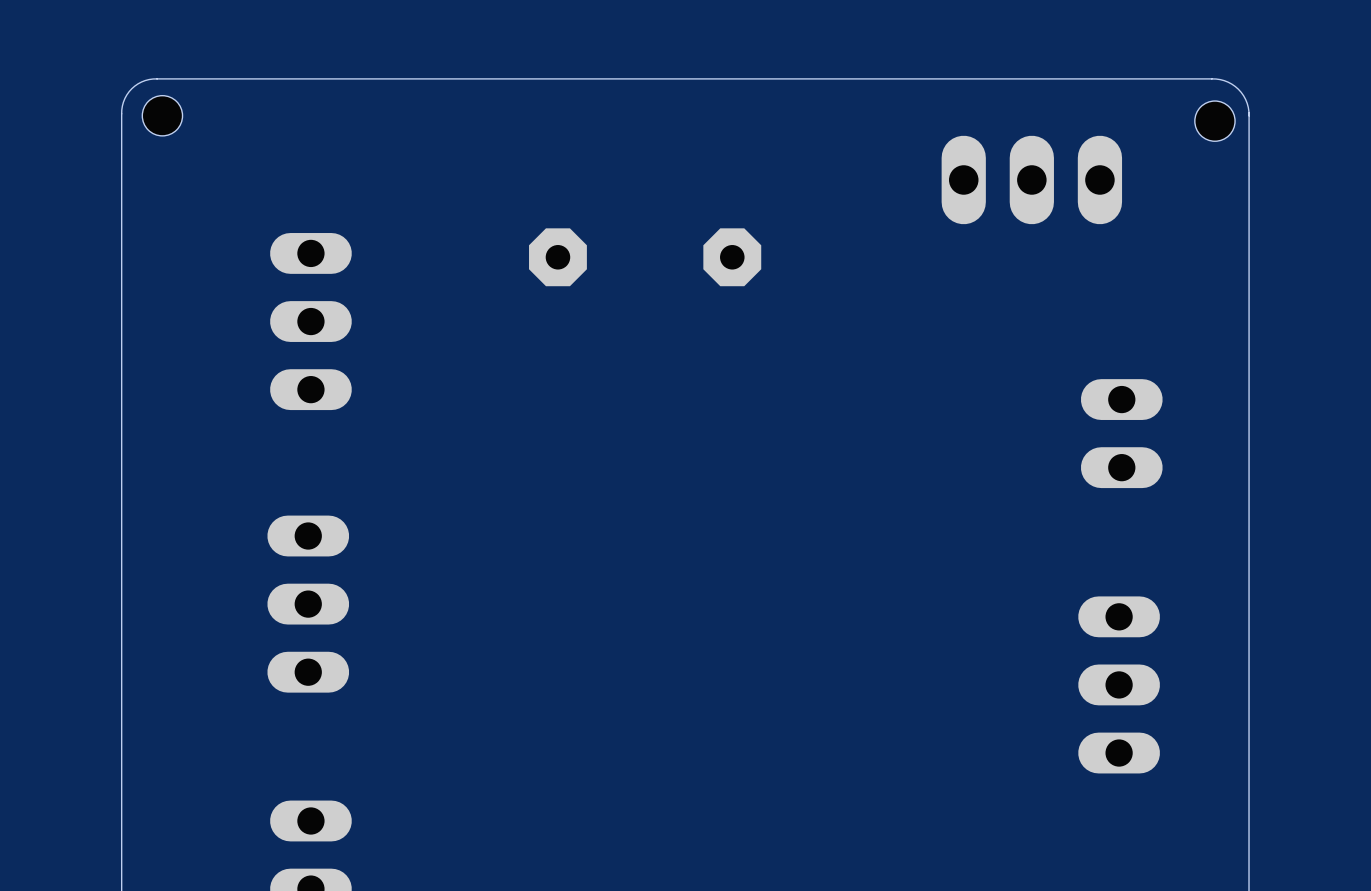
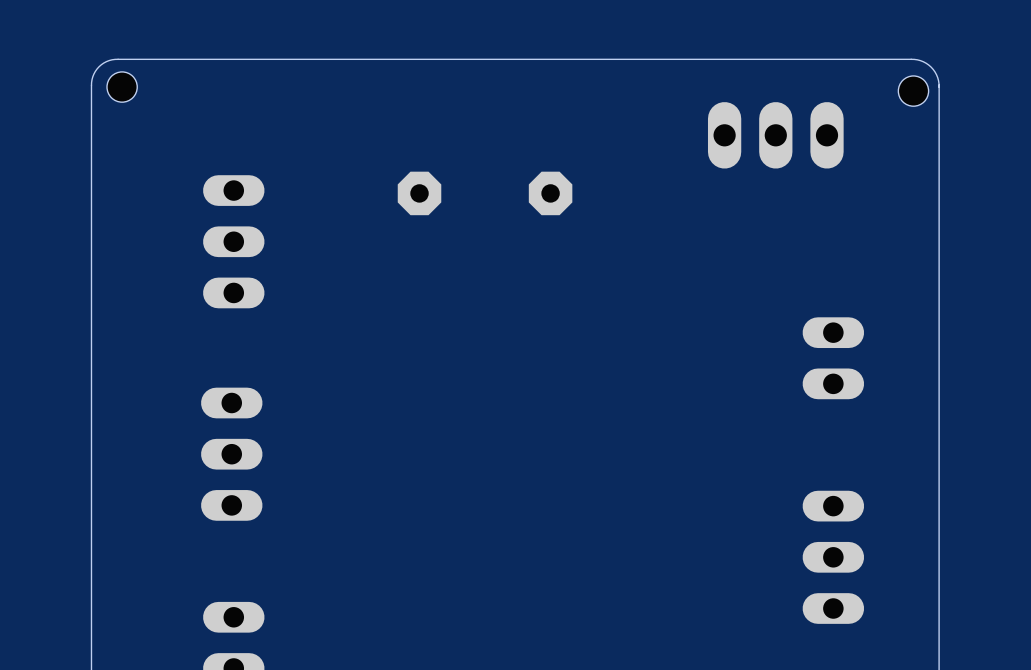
part position: (1121, 433) -> (833, 358)
part position: (1119, 684) -> (833, 557)

